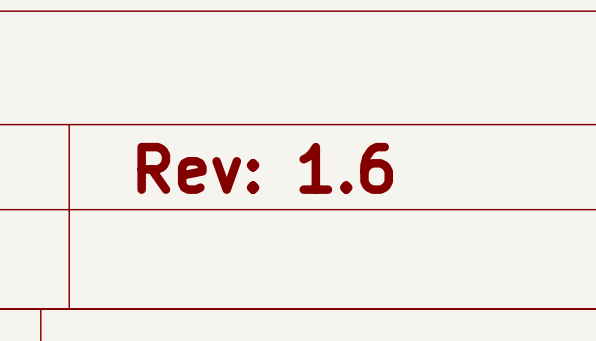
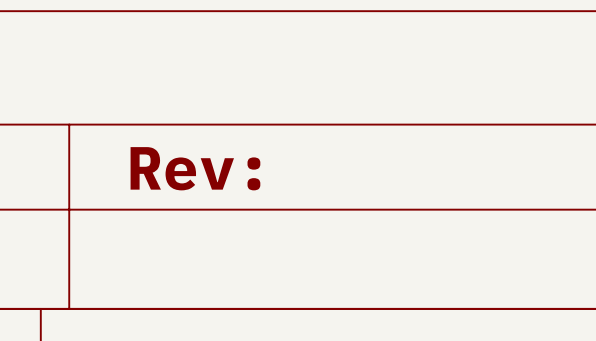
title block: Rev: 1.6 (265, 168) -> Rev: (195, 168)

